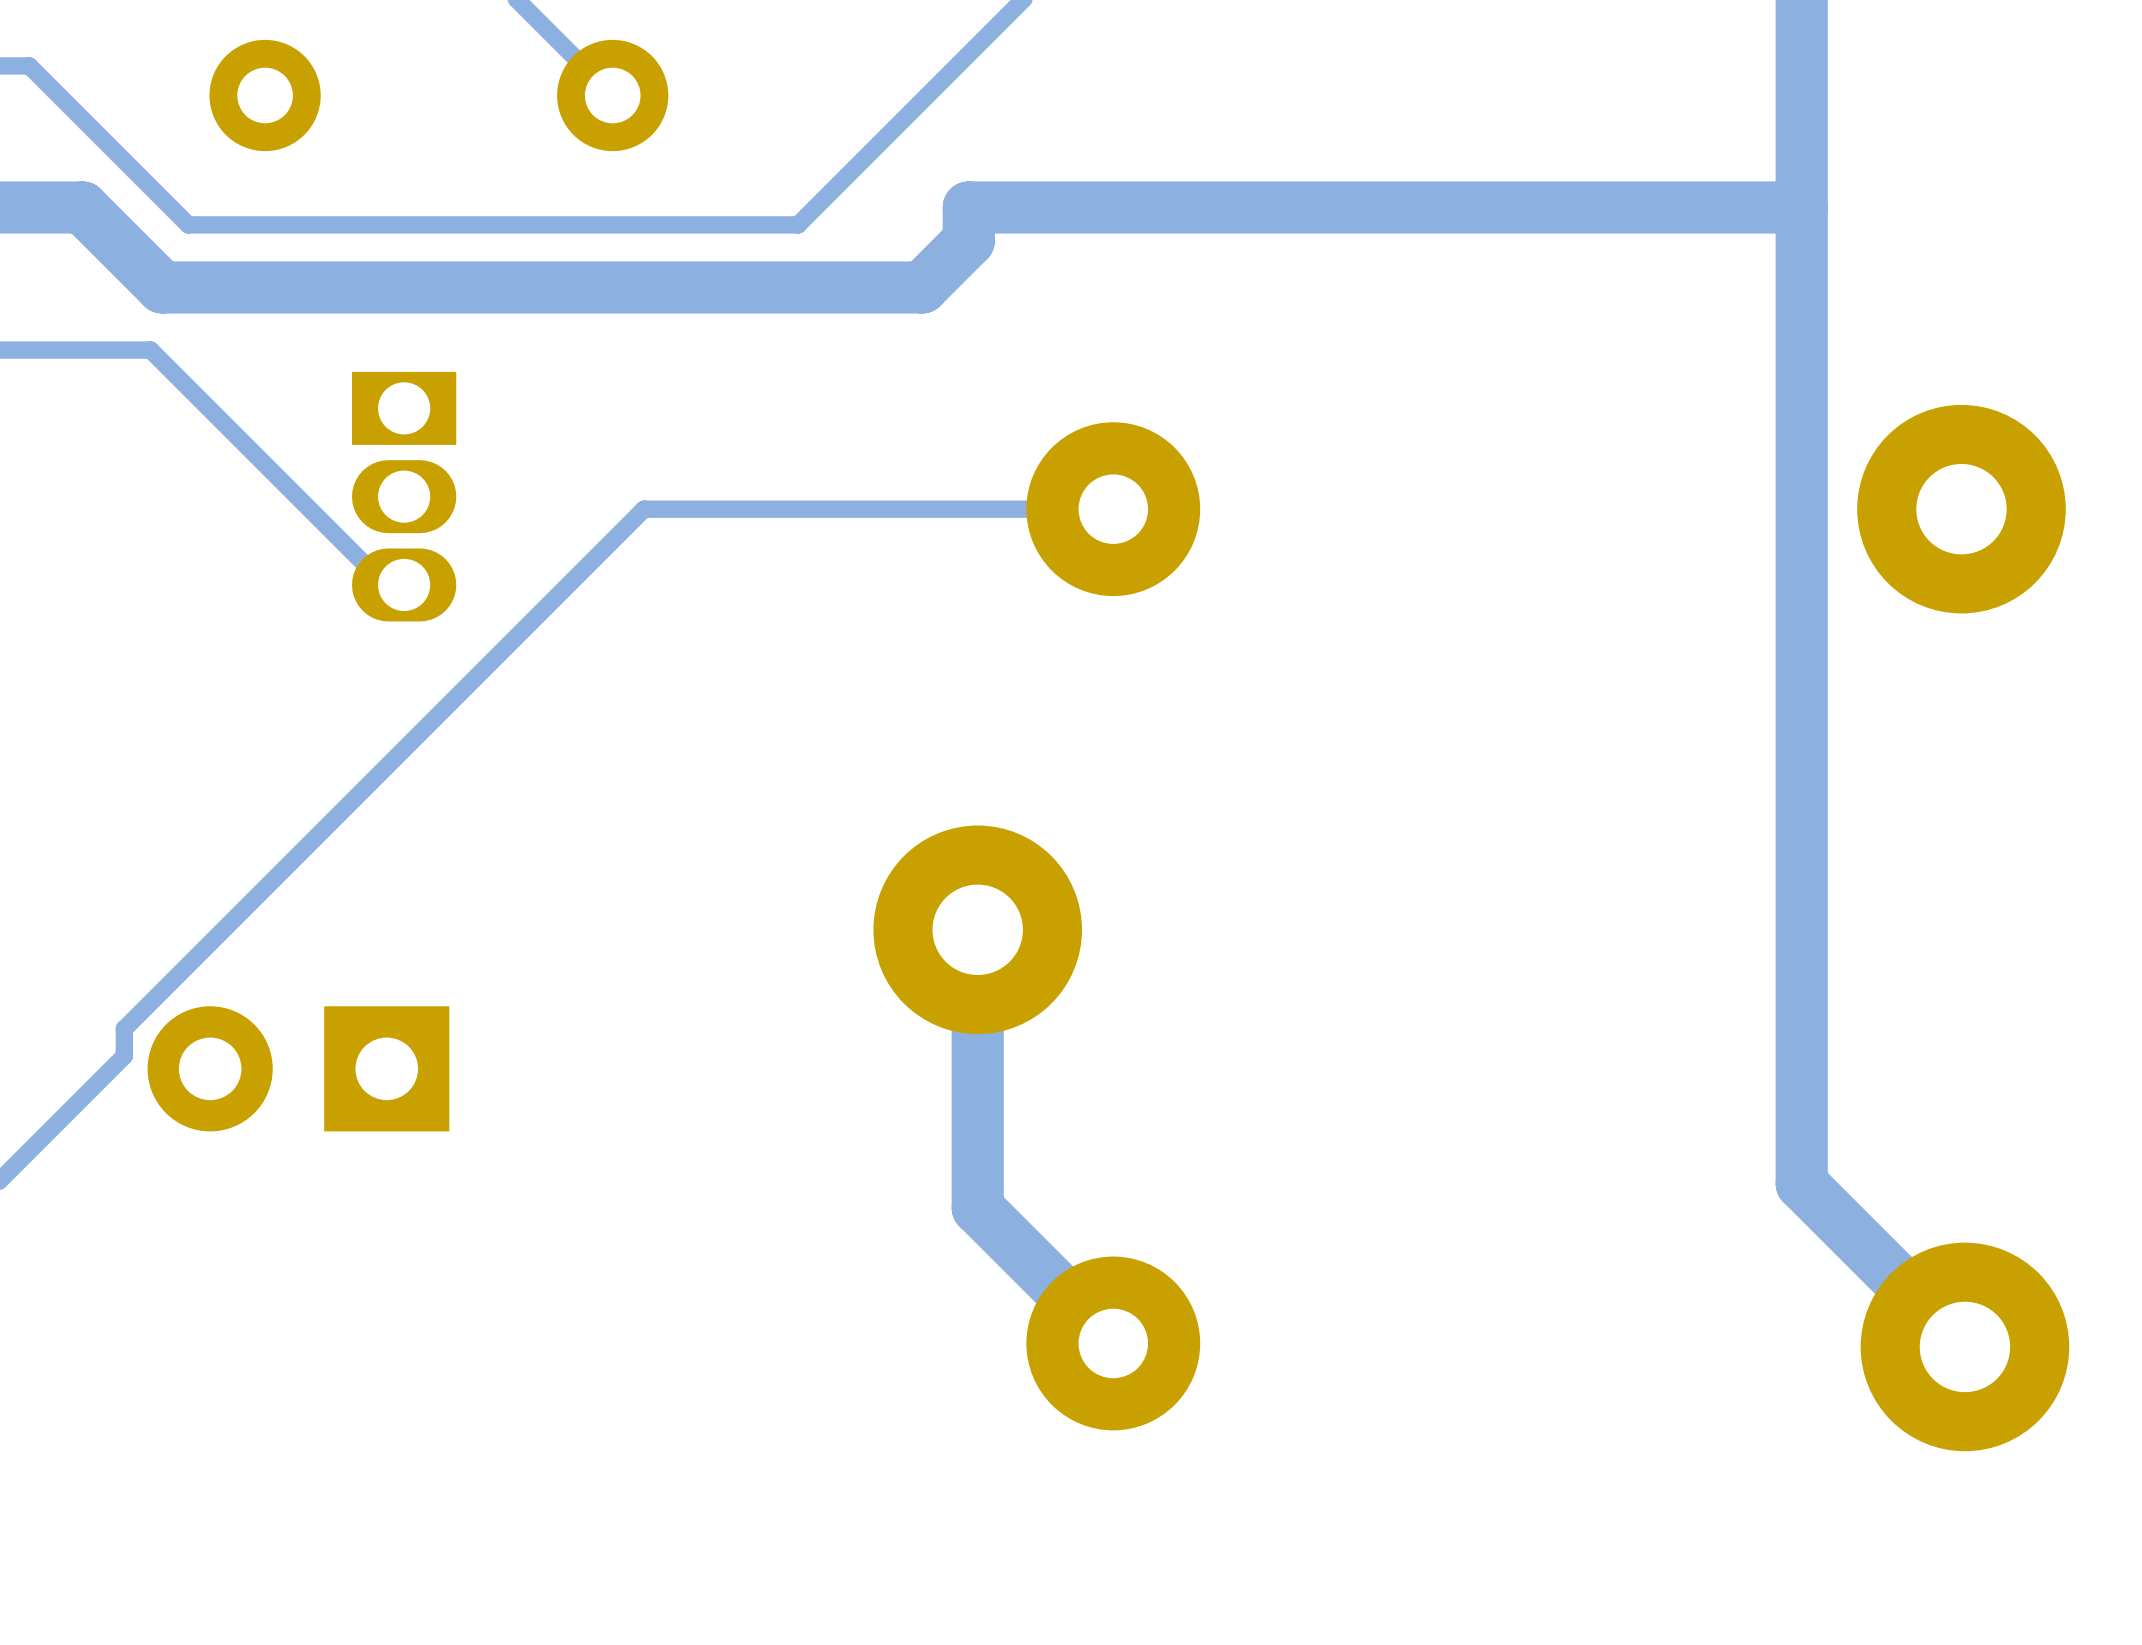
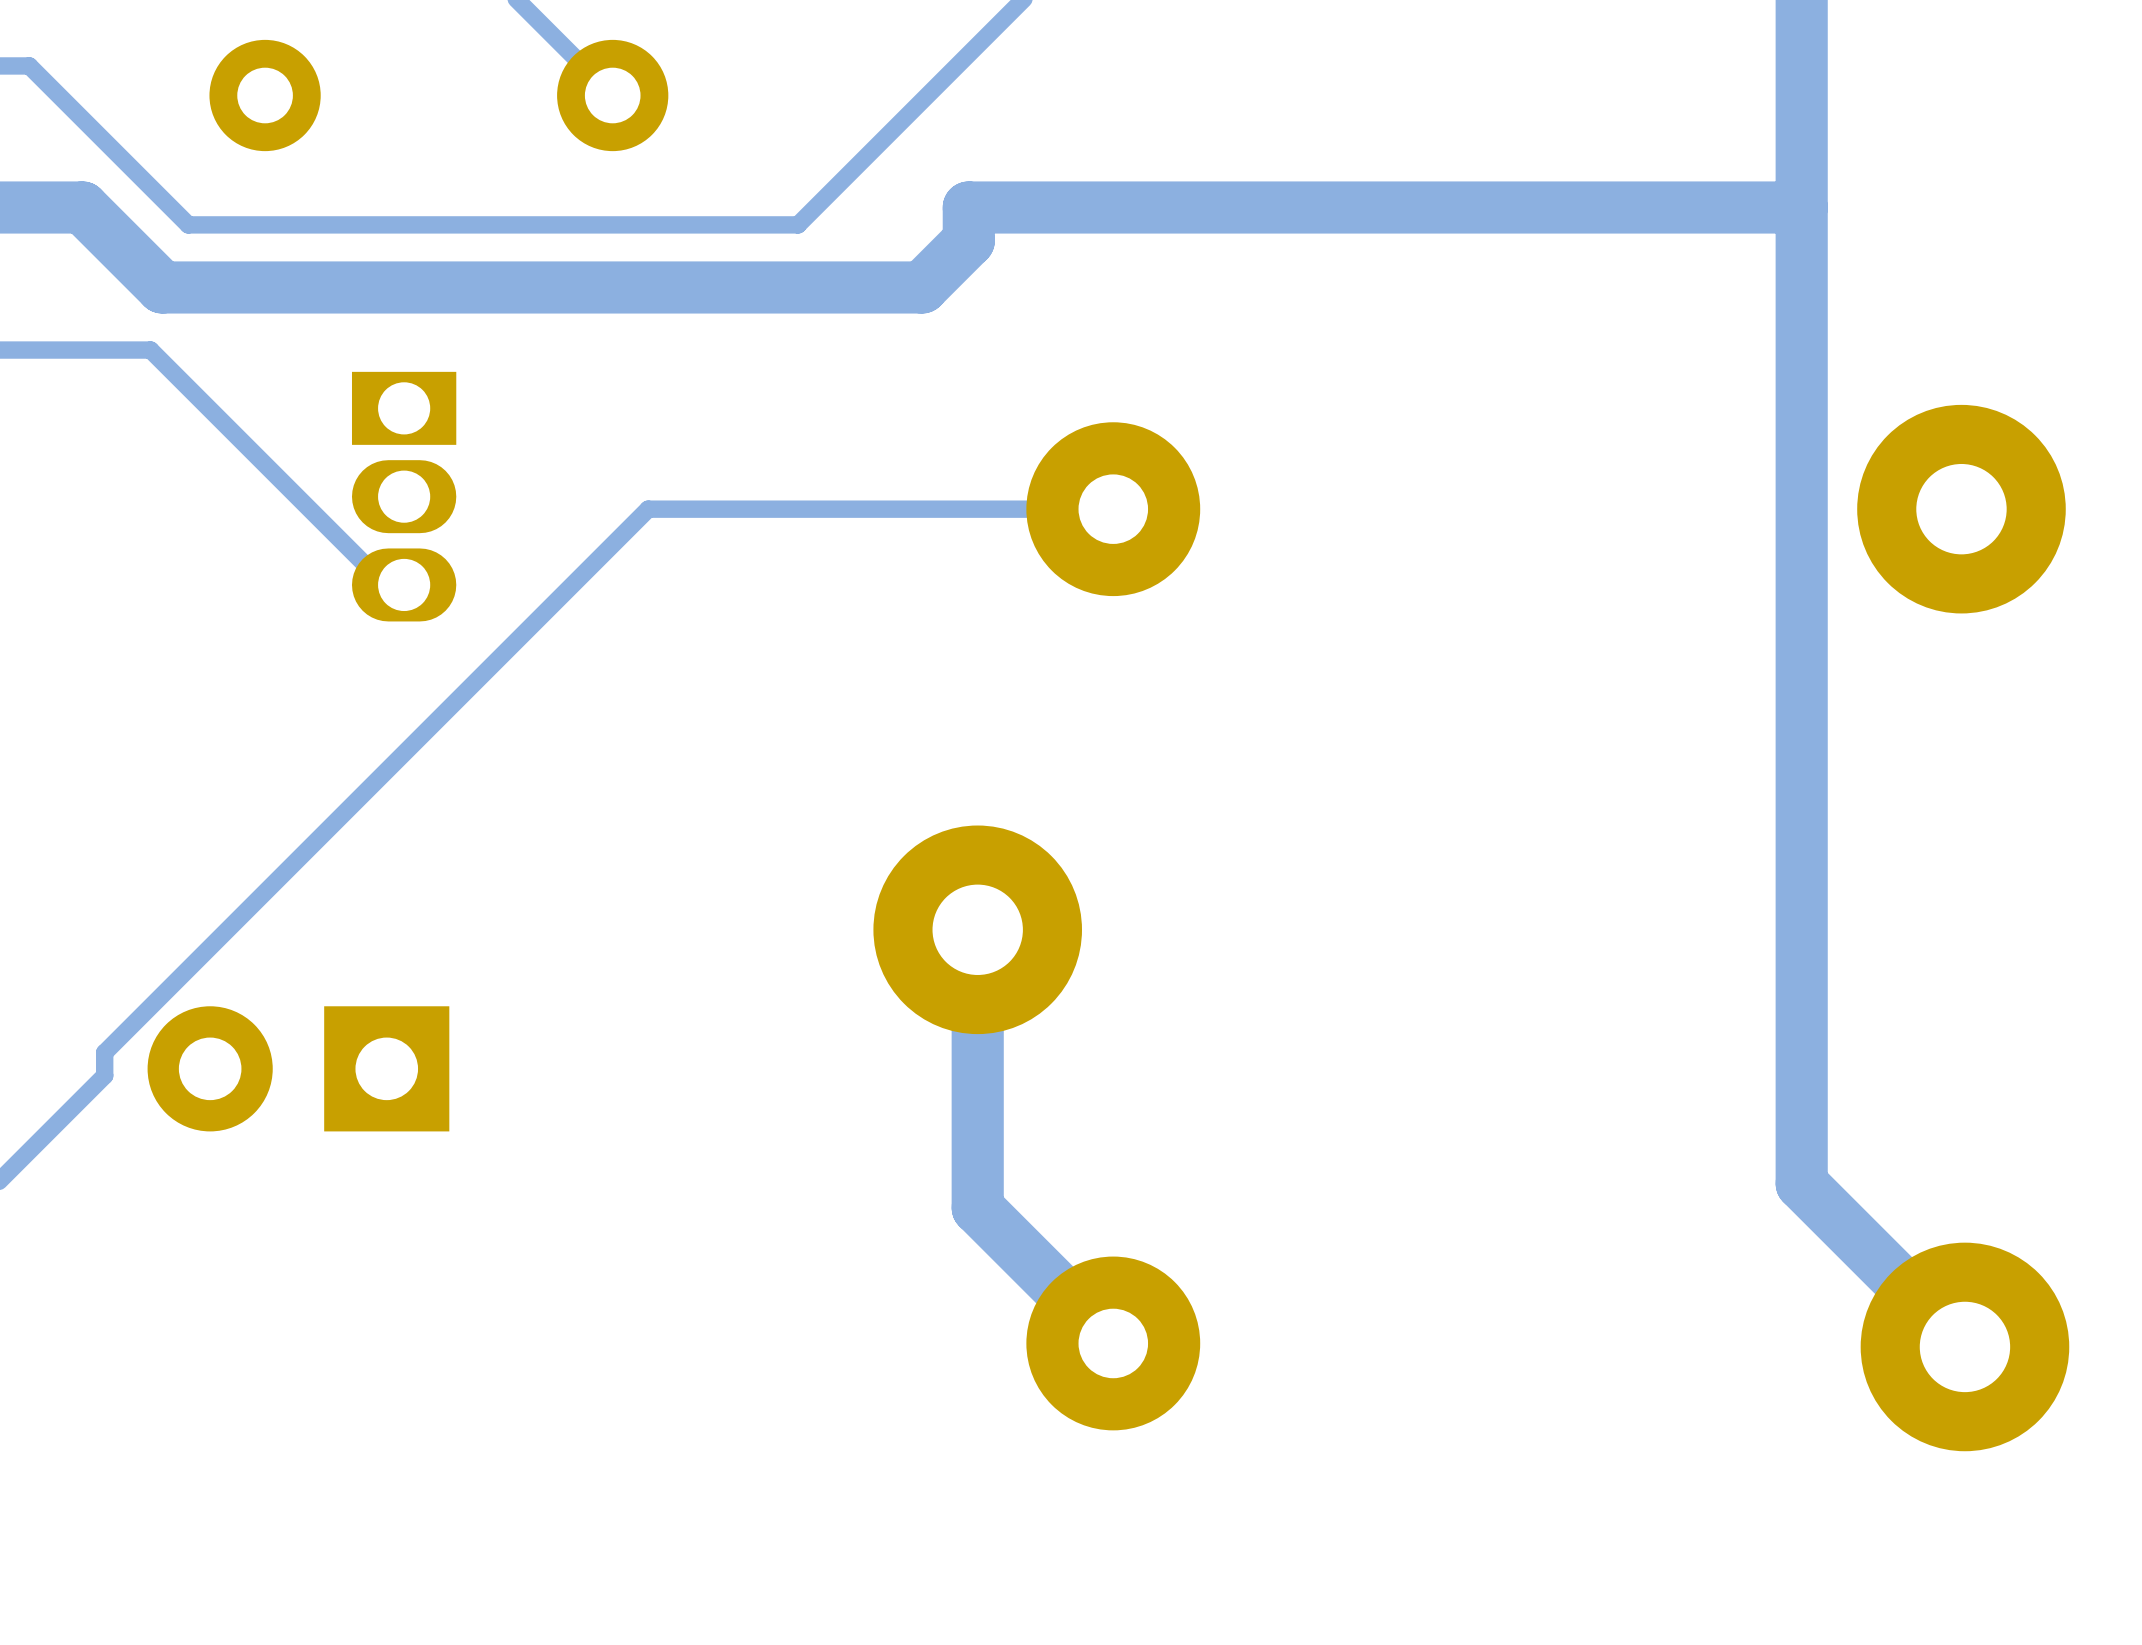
track: (648, 509) (644, 509) (124, 1028) (124, 1055) (104, 1075) -> (648, 509) (104, 1052) (104, 1075)

